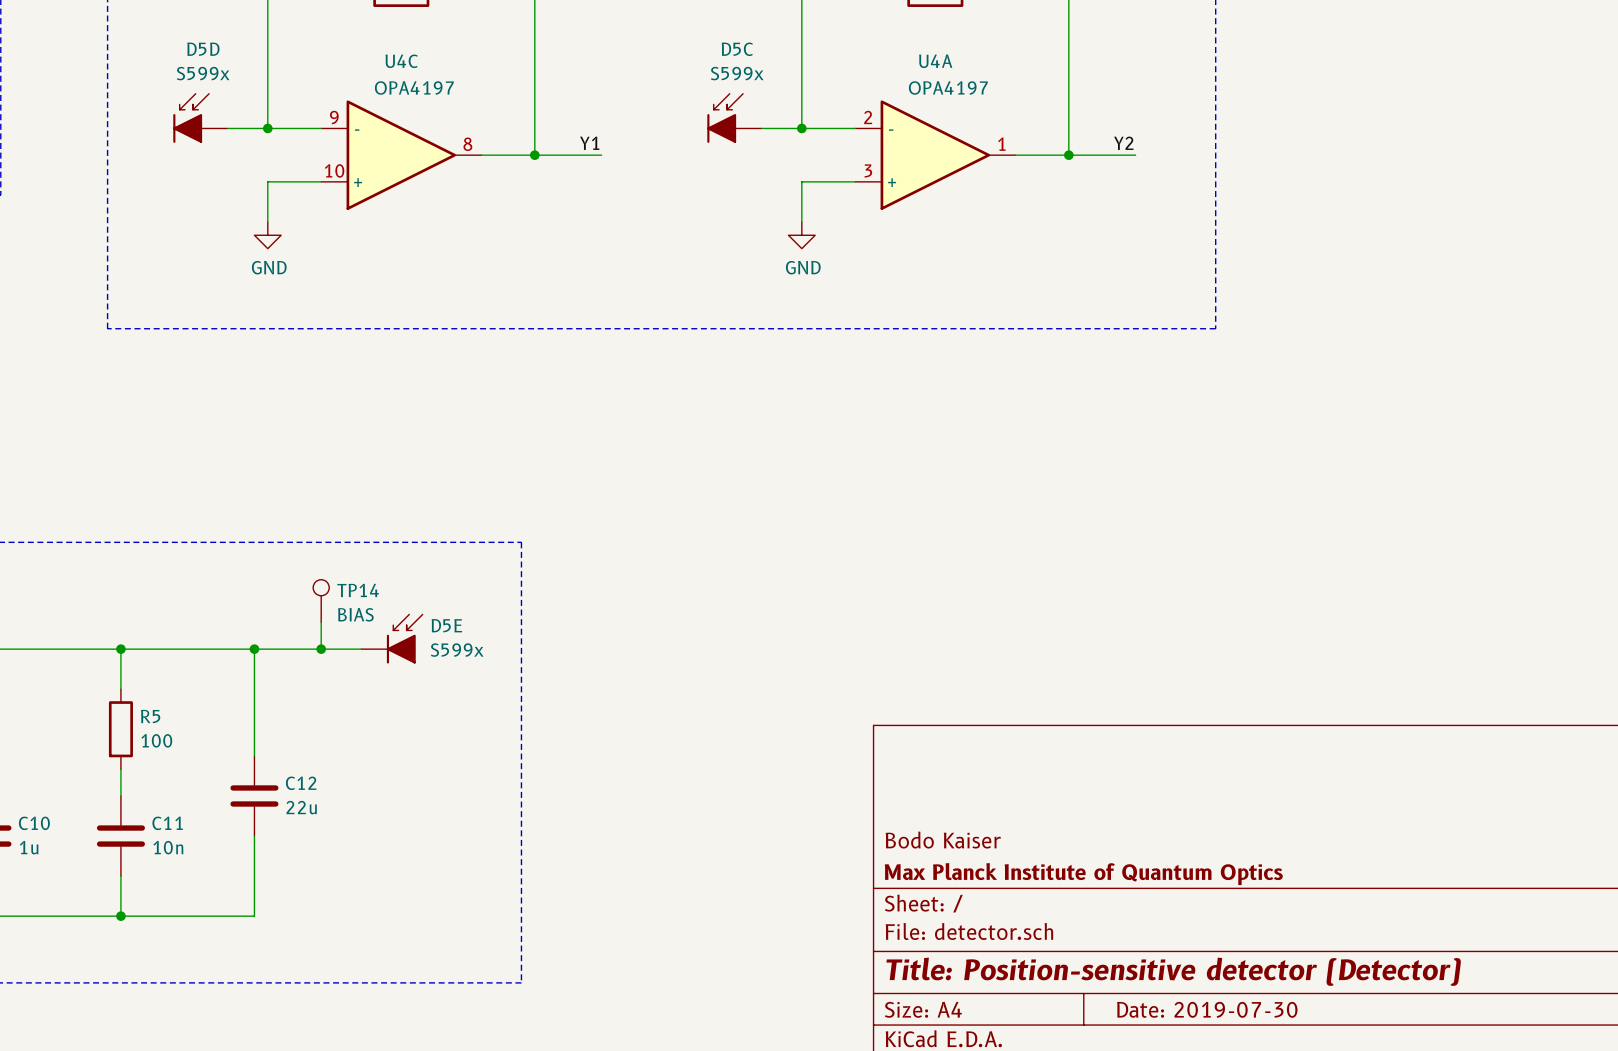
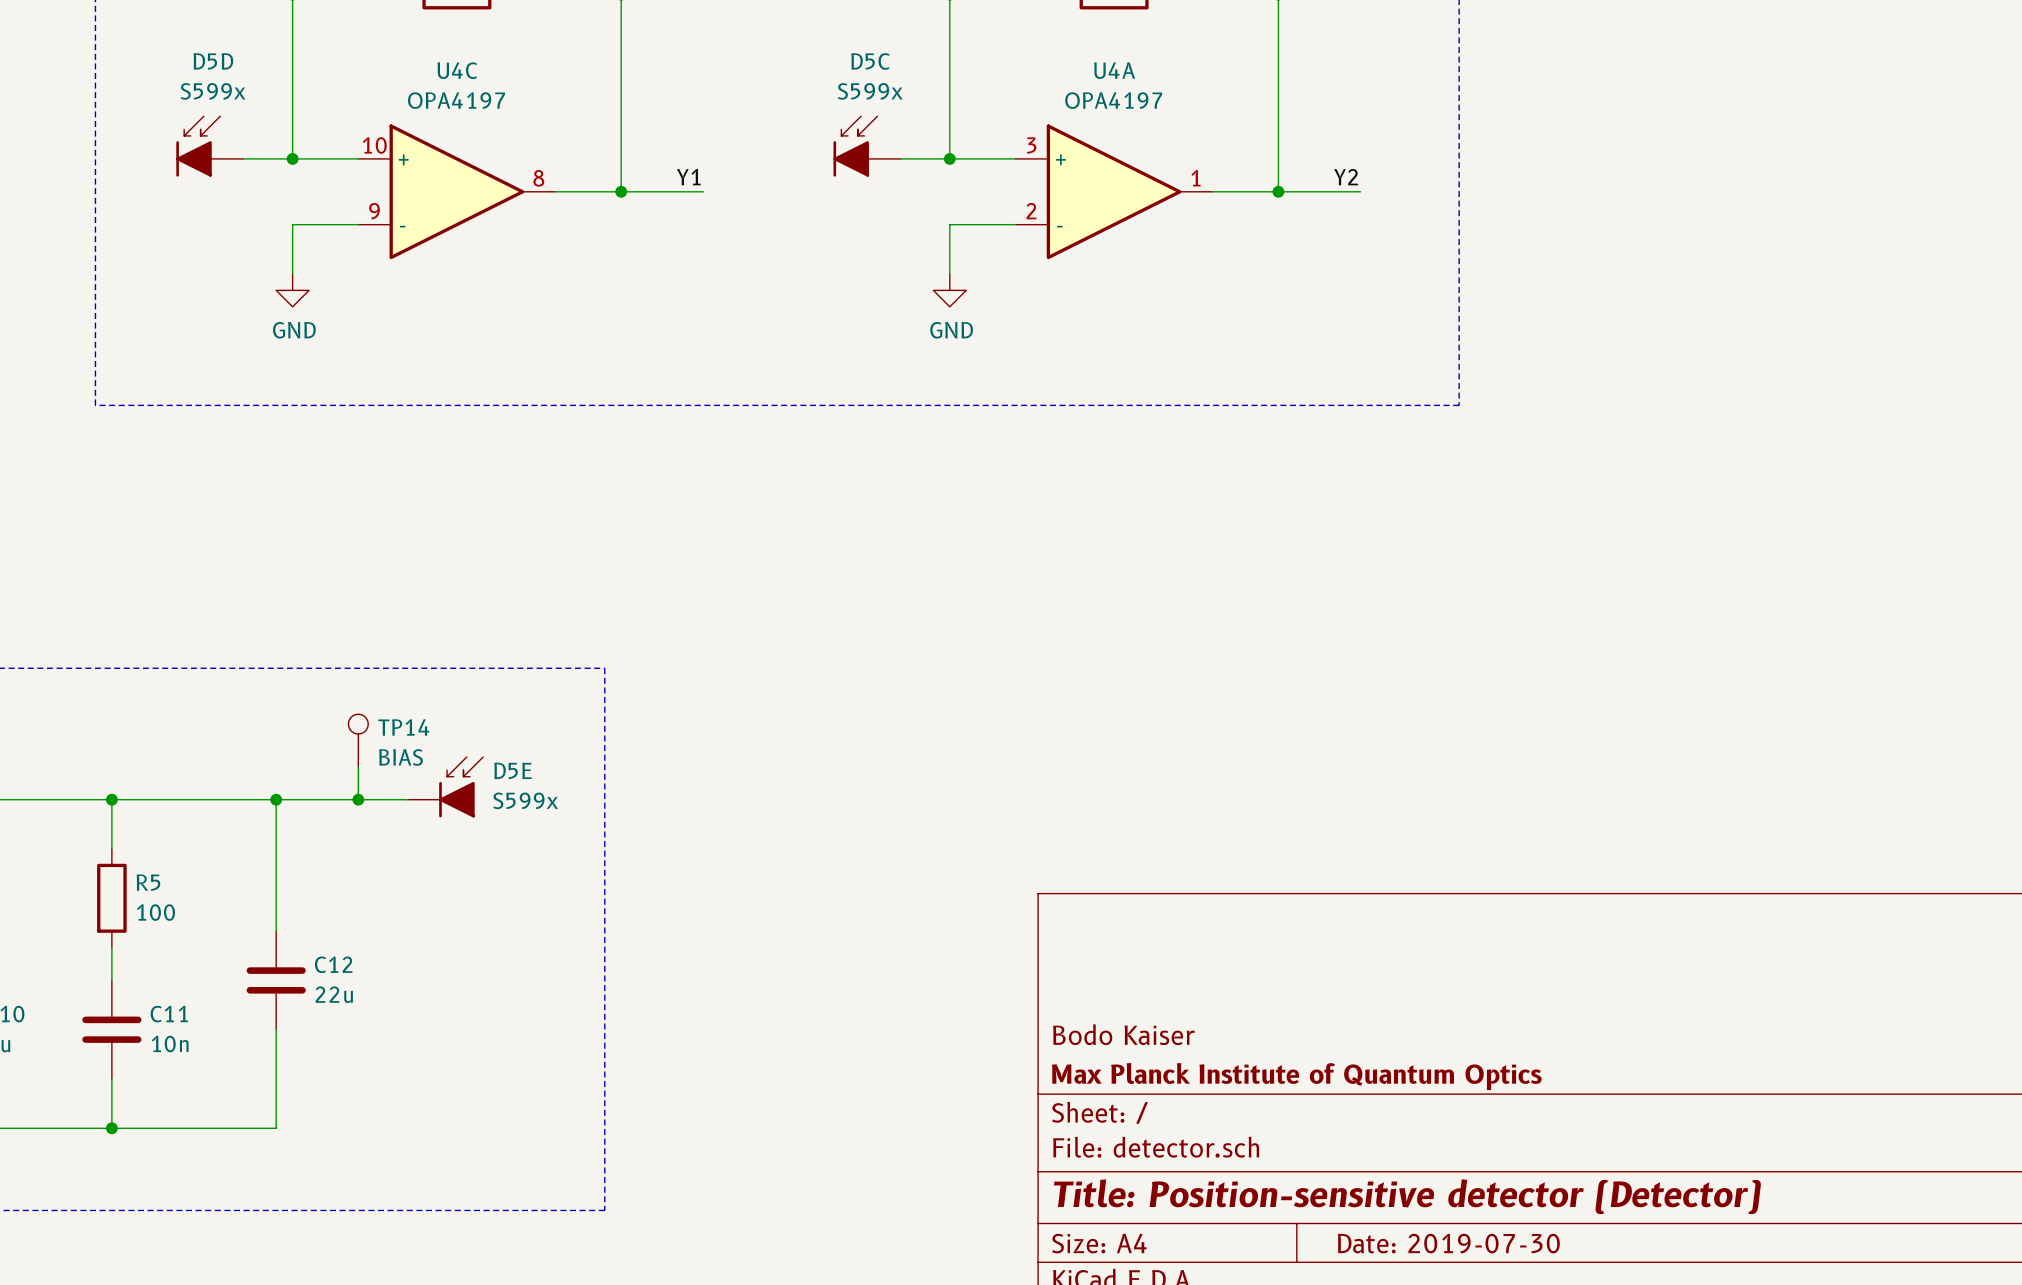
U4C flip: as is (401, 155) -> up-down (456, 191)
U4A flip: as is (935, 155) -> up-down (1114, 191)

